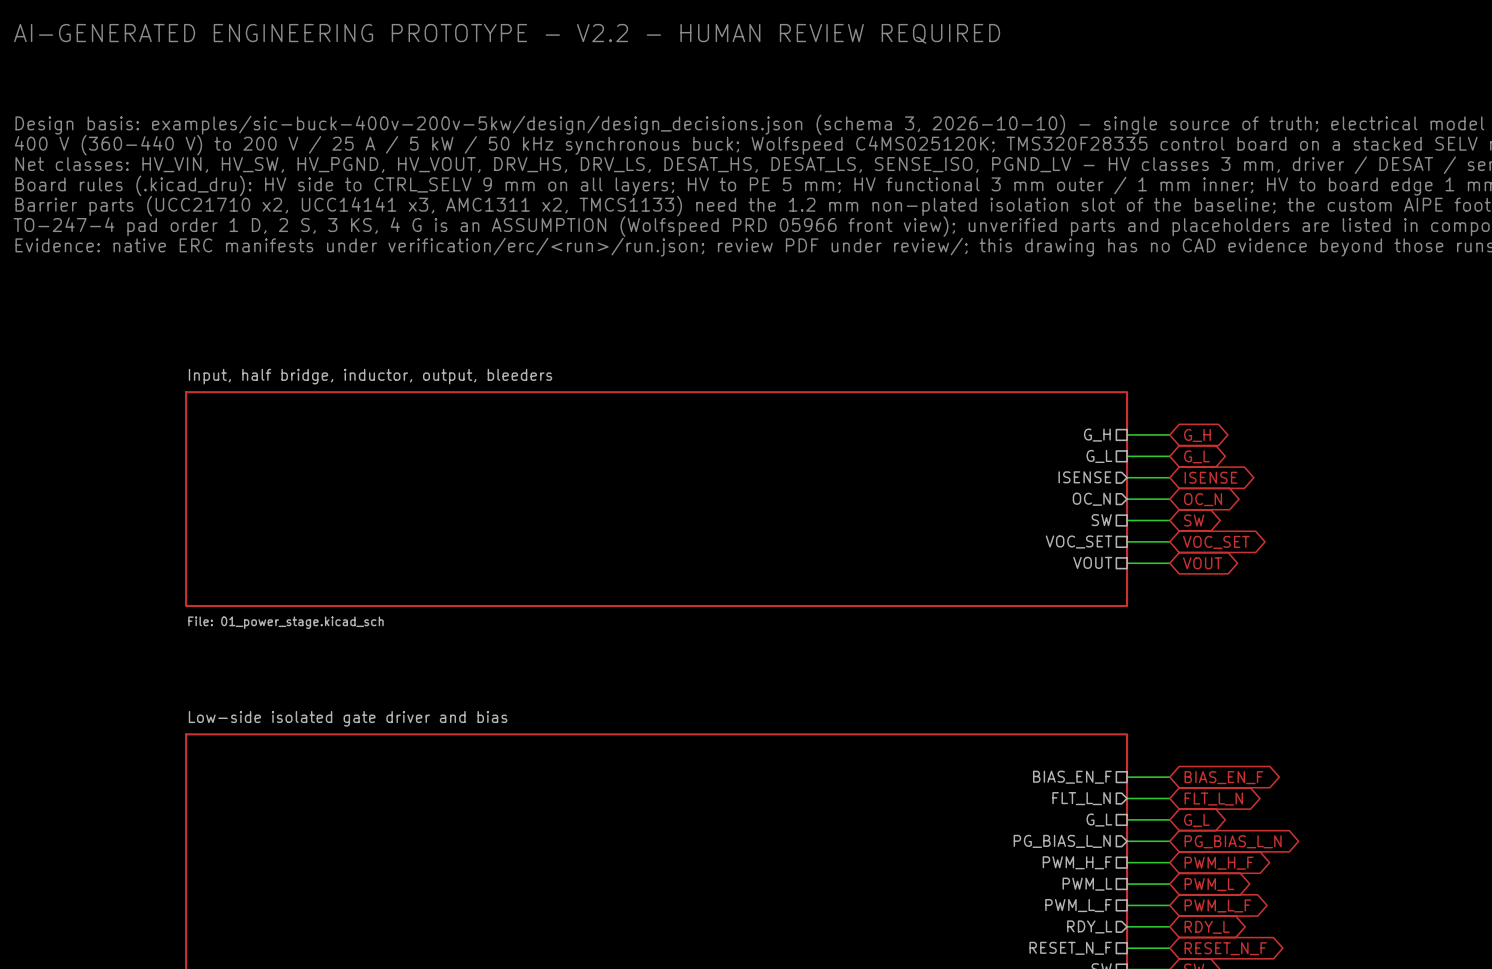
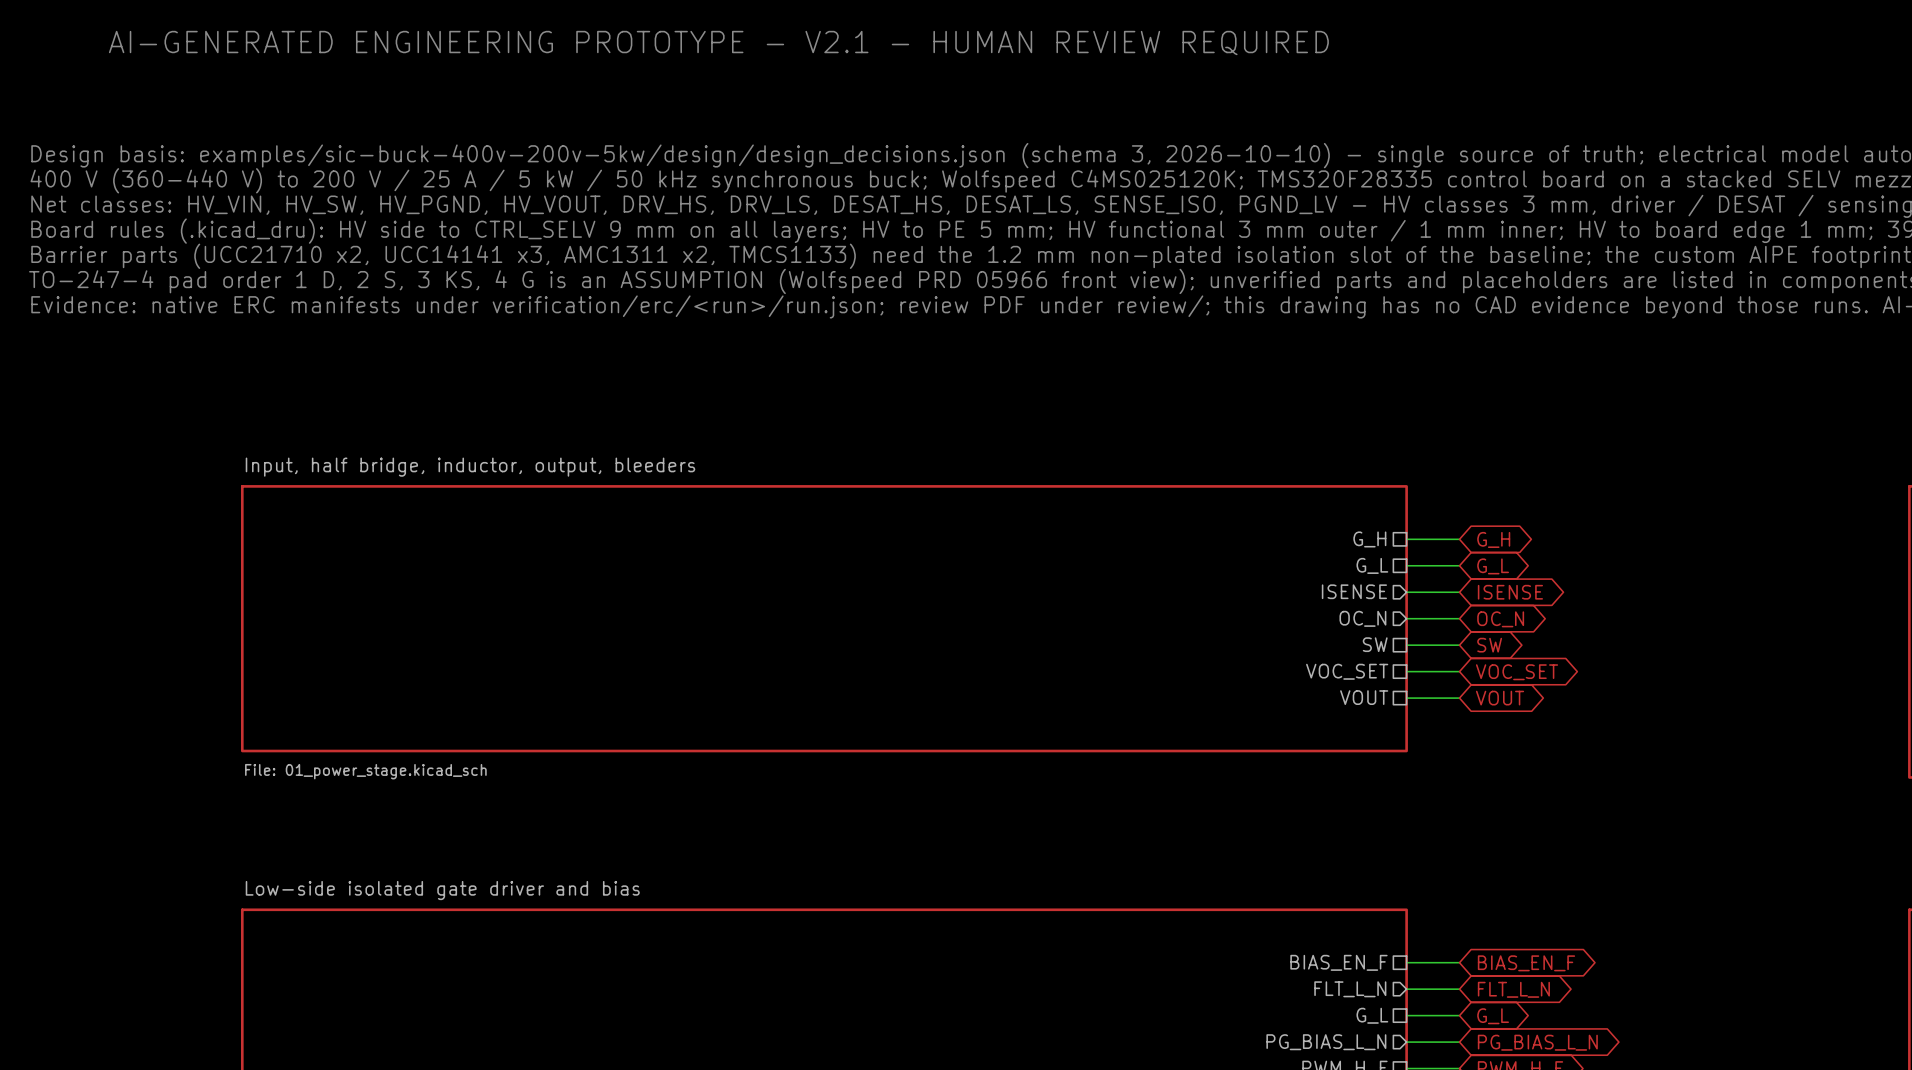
text: AI-GENERATED ENGINEERING PROTOTYPE - V2.2 - HUMAN REVIEW REQUIRED (507, 33) -> AI-GENERATED ENGINEERING PROTOTYPE - V2.1 - HUMAN REVIEW REQUIRED (718, 43)

